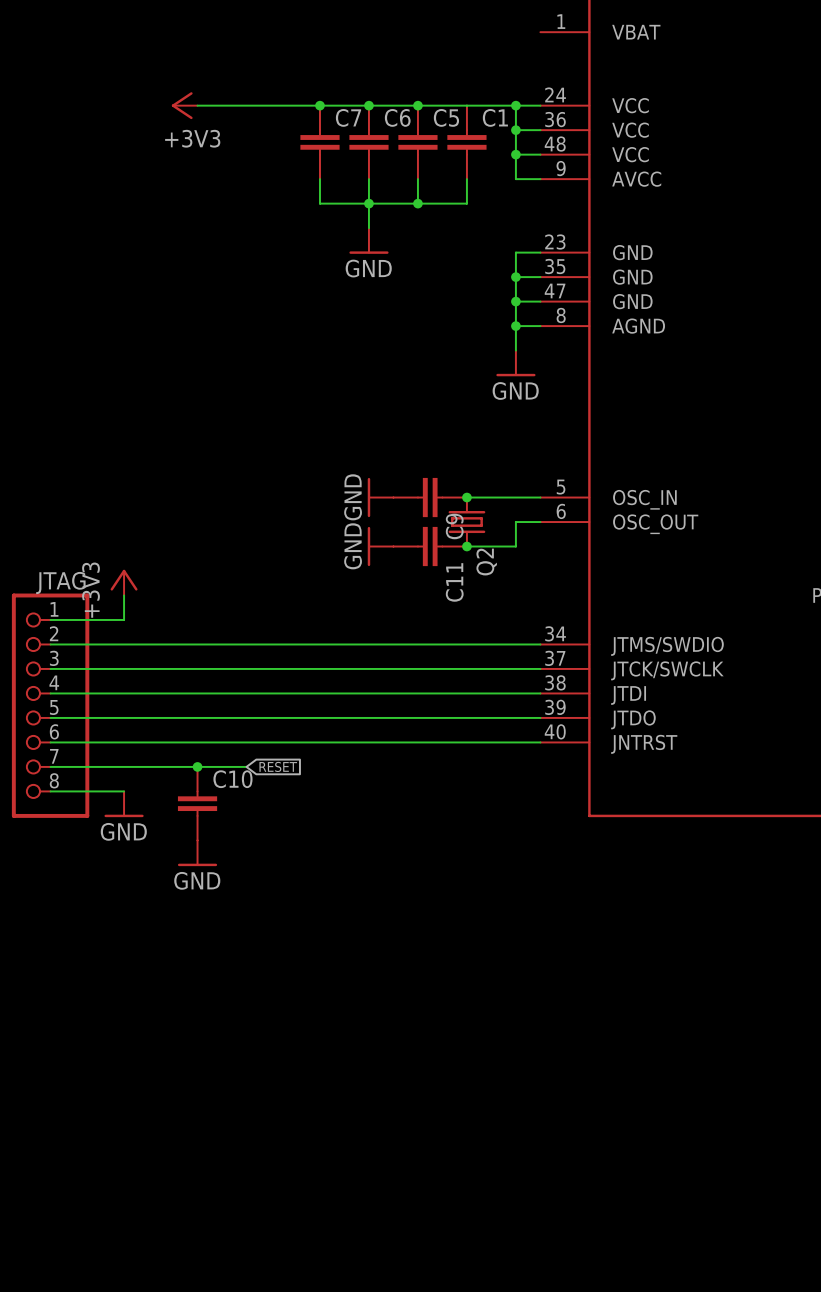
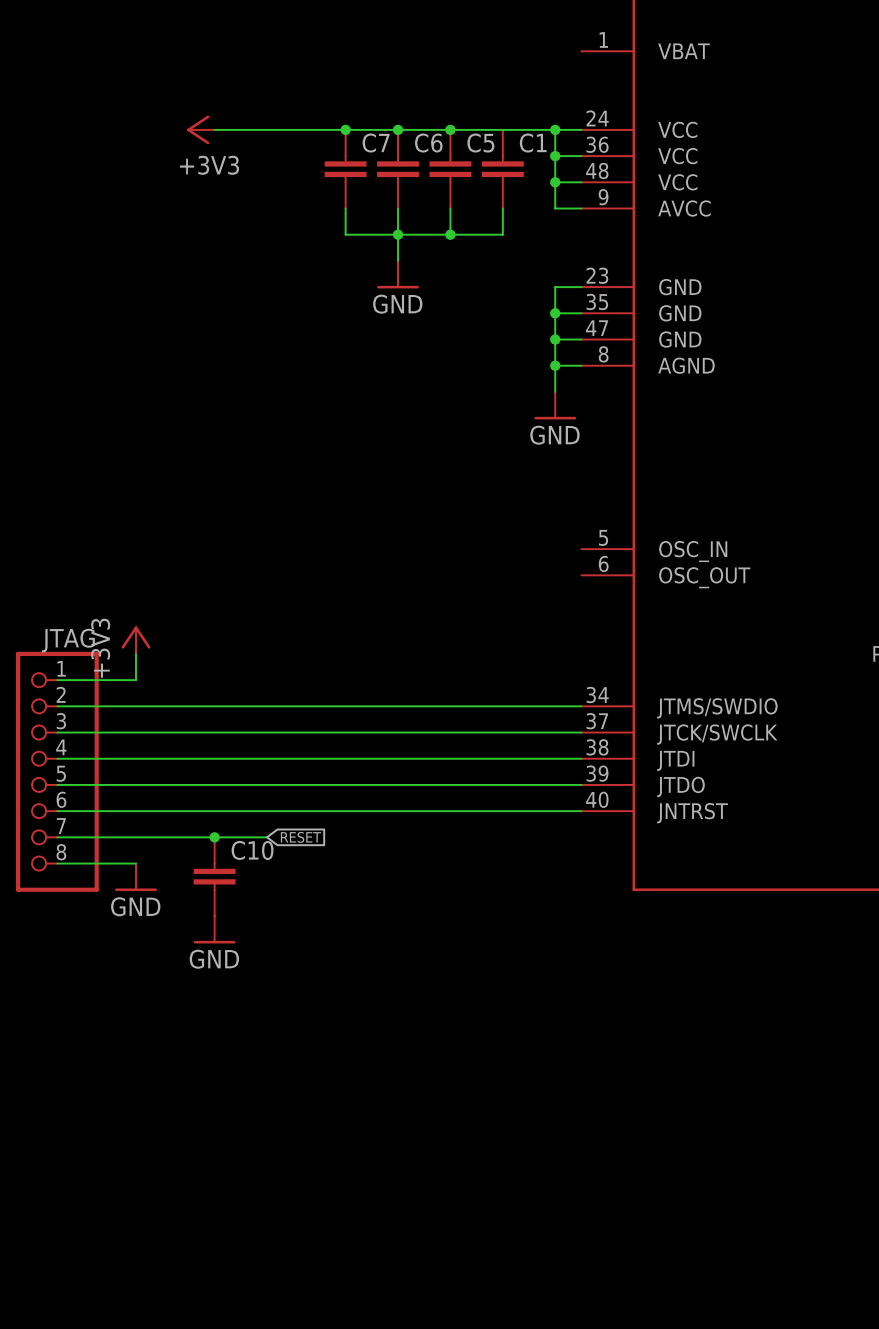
power symbol: GND (380, 497) -> none
C9: (430, 497) -> none
wire: (466, 497) (540, 497) -> none
junction: (466, 497) -> none
Q2: (466, 522) -> none
wire: (540, 522) (515, 522) (515, 546) (466, 546) -> none
power symbol: GND (380, 546) -> none
C11: (430, 546) -> none
junction: (466, 546) -> none

